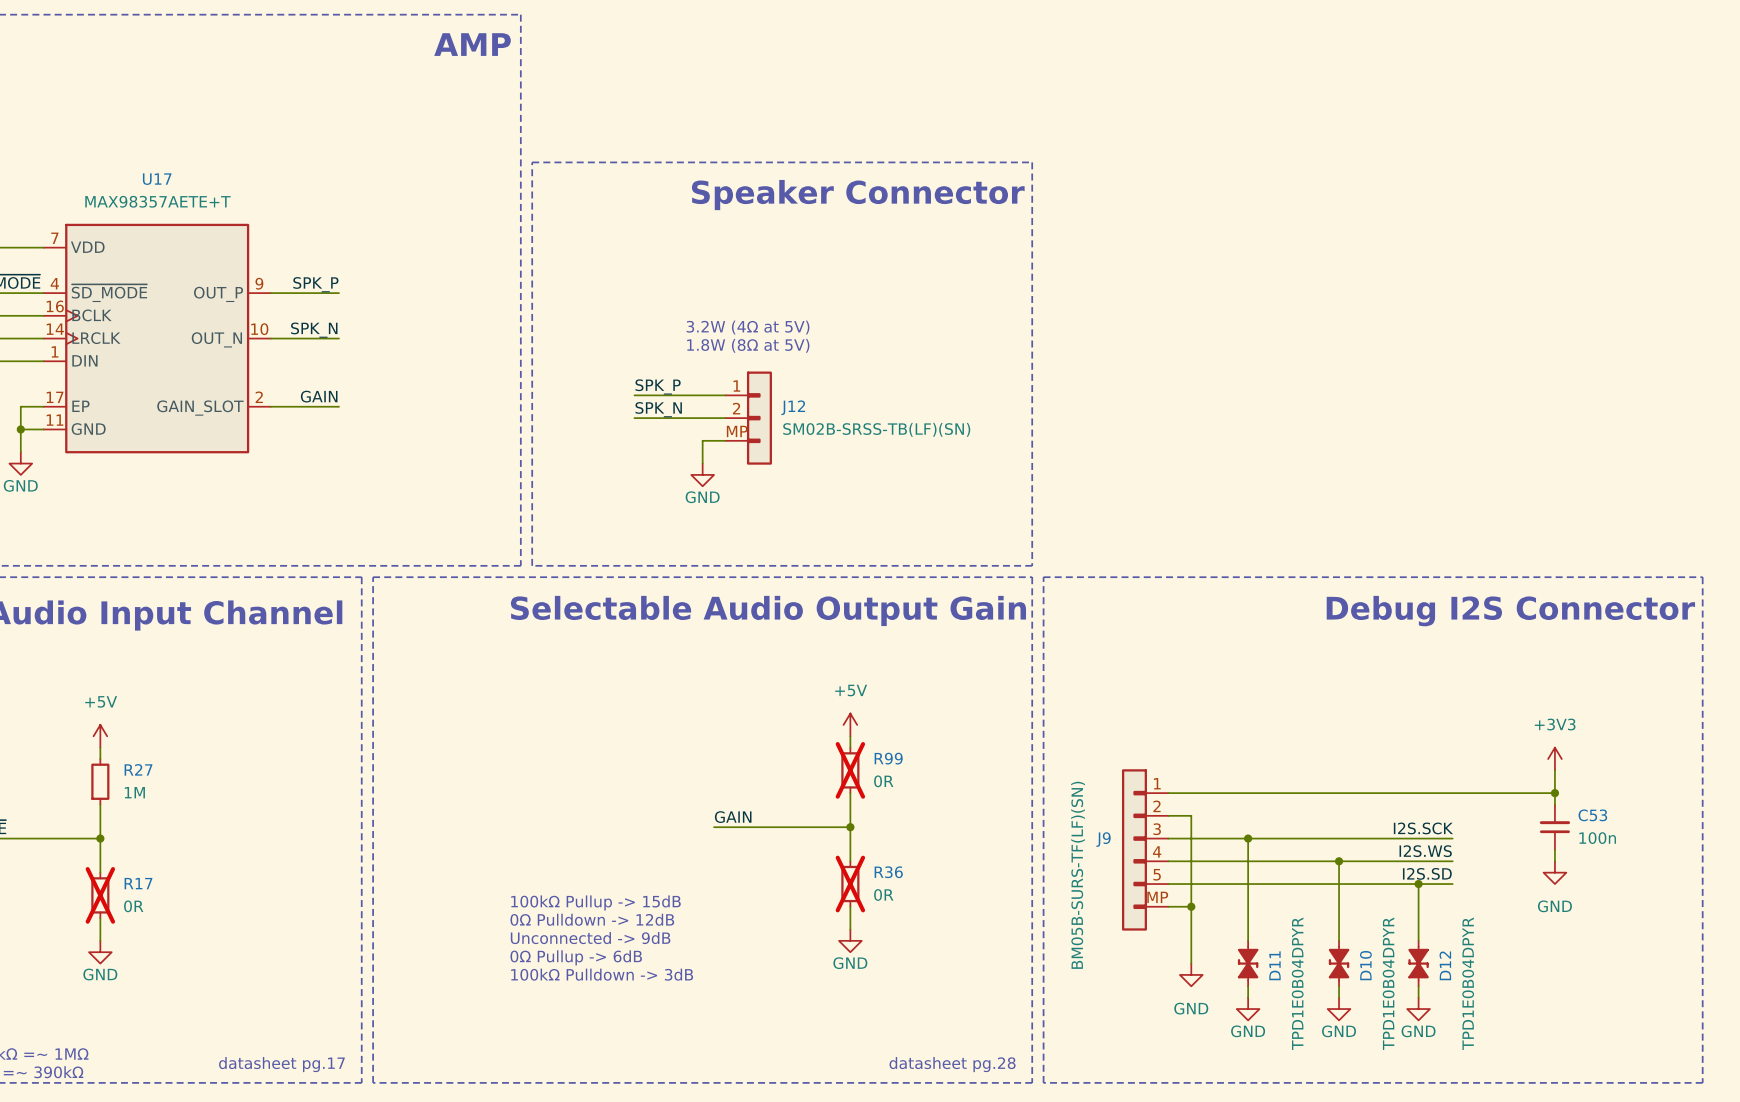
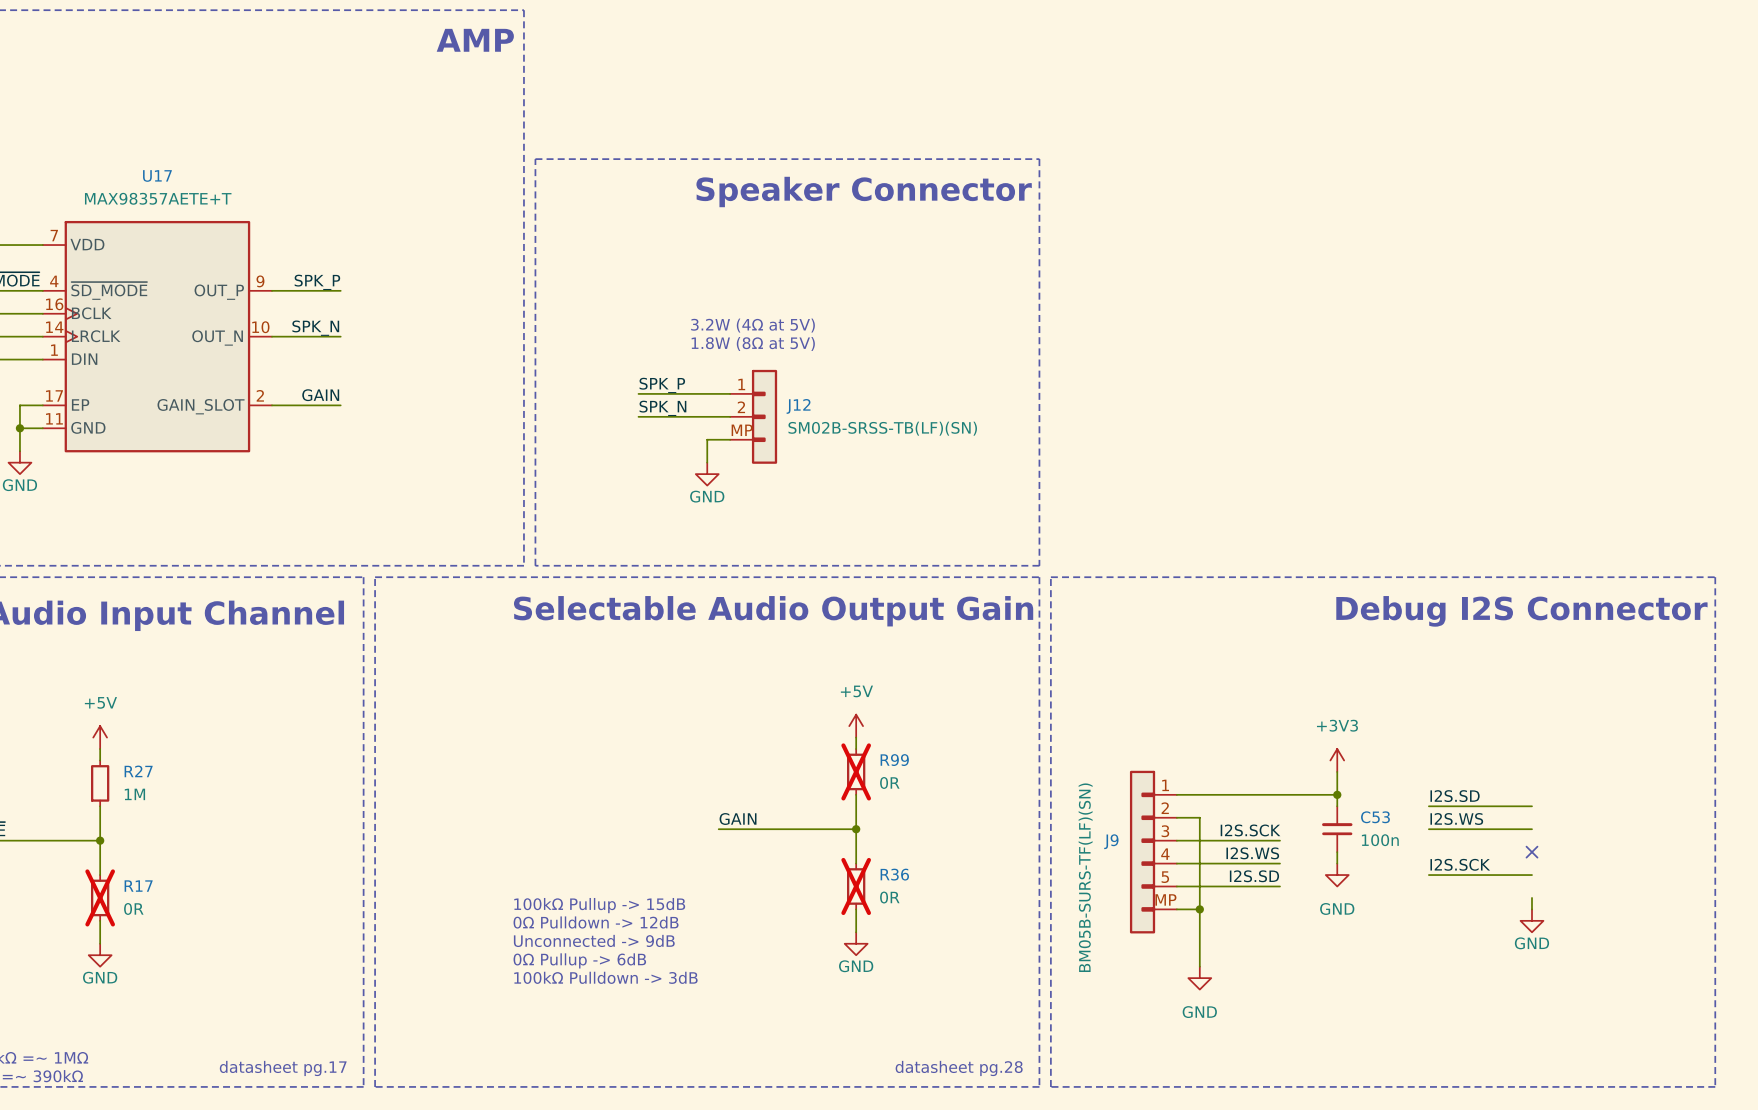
power symbol: none -> +3V3 (1337, 760)
power symbol: +3V3 (1554, 759) -> none
wire: none -> (1337, 771) (1337, 806)
wire: (1554, 770) (1554, 804) -> none
wire: (1327, 793) (1554, 793) -> none
junction: none -> (1337, 794)
junction: (1554, 793) -> none
wire: none -> (1428, 806) (1531, 806)
wire: none -> (1428, 829) (1531, 829)
C53 position: (1554, 827) -> (1337, 829)
label: none -> I2S.SCK (1250, 830)
label position: I2S.SCK (1423, 828) -> I2S.SCK (1460, 864)
wire: (1248, 838) (1248, 940) -> none
junction: (1248, 838) -> none
wire: (1270, 838) (1452, 838) -> none
no-connect mark: none -> (1531, 852)
wire: (1554, 849) (1554, 861) -> (1531, 897) (1531, 909)
label: none -> I2S.WS (1252, 853)
label position: I2S.WS (1425, 851) -> I2S.WS (1456, 819)
wire: (1270, 861) (1452, 861) -> none
wire: (1339, 861) (1339, 940) -> none
junction: (1339, 861) -> none
power symbol: none -> GND (1337, 875)
wire: none -> (1428, 875) (1531, 875)
power symbol position: GND (1554, 872) -> GND (1531, 920)
label: none -> I2S.SD (1254, 876)
label position: I2S.SD (1427, 873) -> I2S.SD (1455, 796)
wire: (1270, 884) (1452, 884) -> none
wire: (1418, 884) (1418, 940) -> none
junction: (1418, 884) -> none
power symbol text position: GND (1554, 906) -> GND (1531, 943)
D11: (1248, 963) -> none
D10: (1339, 963) -> none
D12: (1418, 963) -> none
wire: (1248, 986) (1248, 997) -> none
wire: (1339, 986) (1339, 997) -> (1337, 852) (1337, 863)
wire: (1418, 986) (1418, 997) -> none
power symbol: GND (1248, 1009) -> none
power symbol: GND (1339, 1009) -> none
power symbol: GND (1418, 1009) -> none

